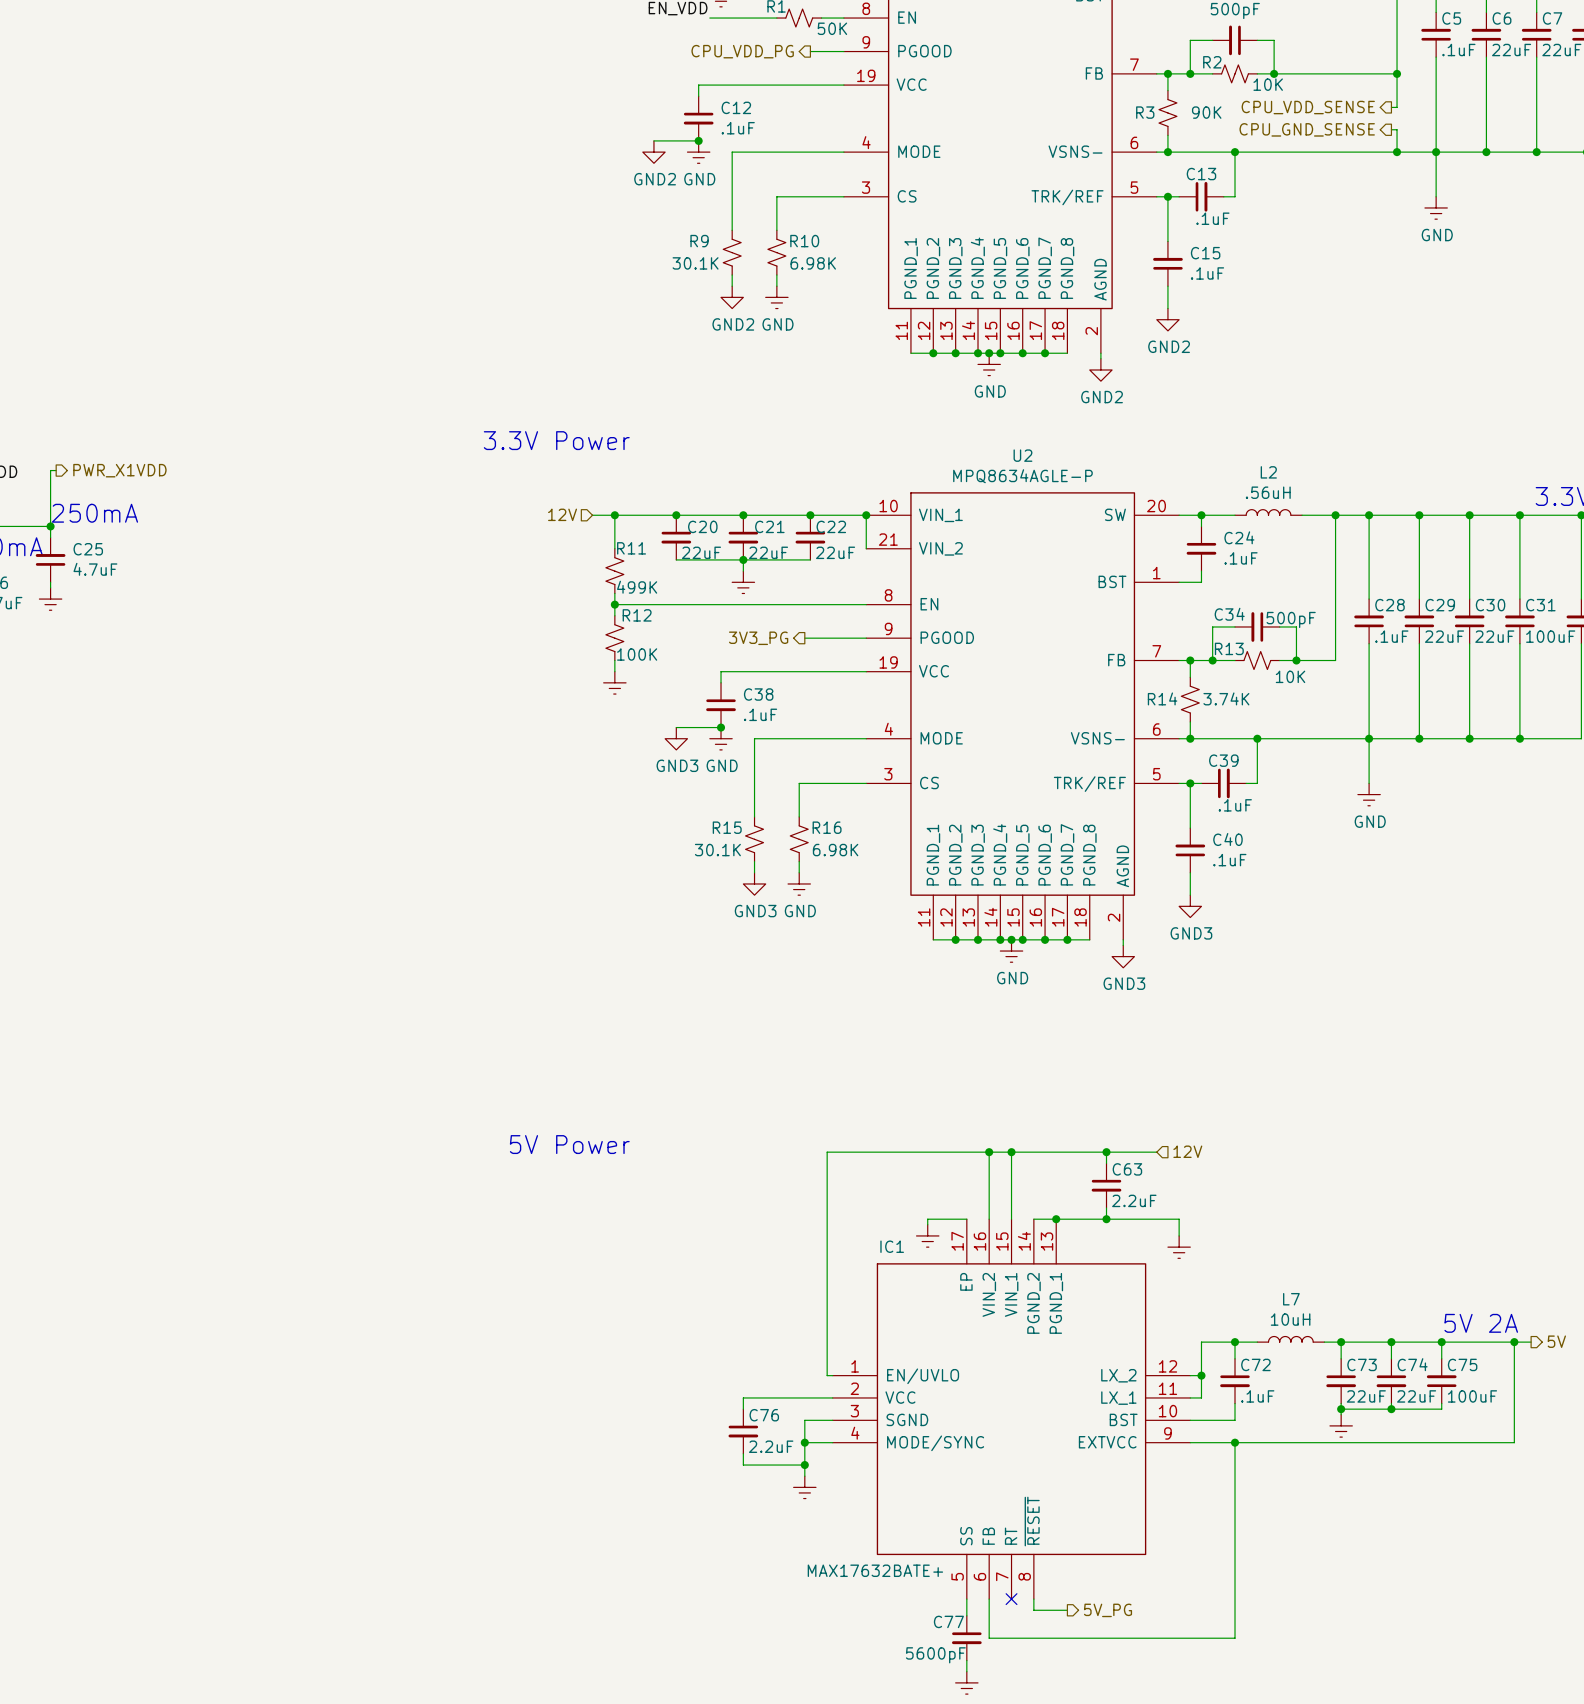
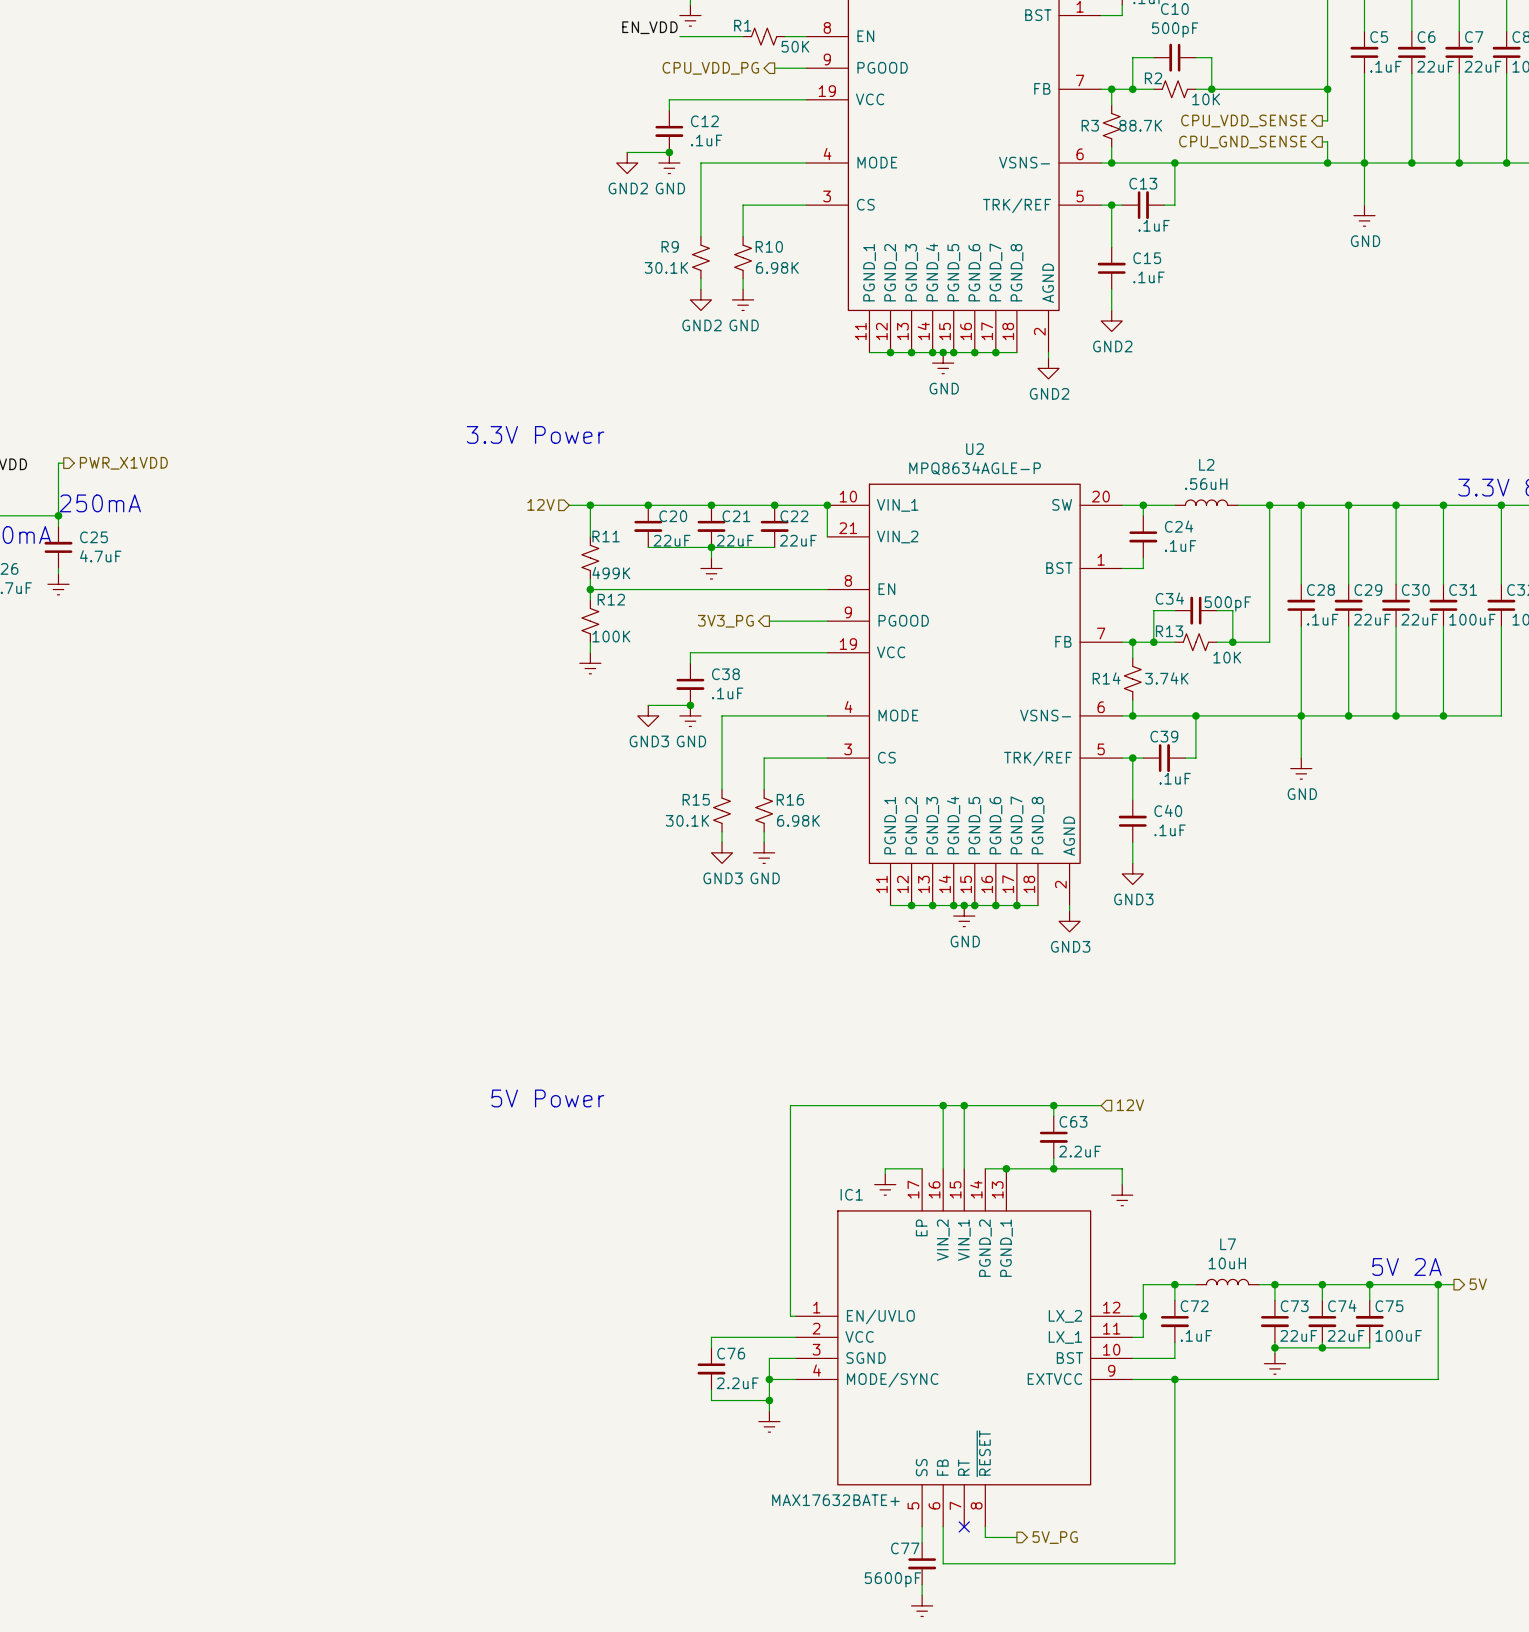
R3 value: 90K (1206, 112) -> 88.7K (1140, 125)

